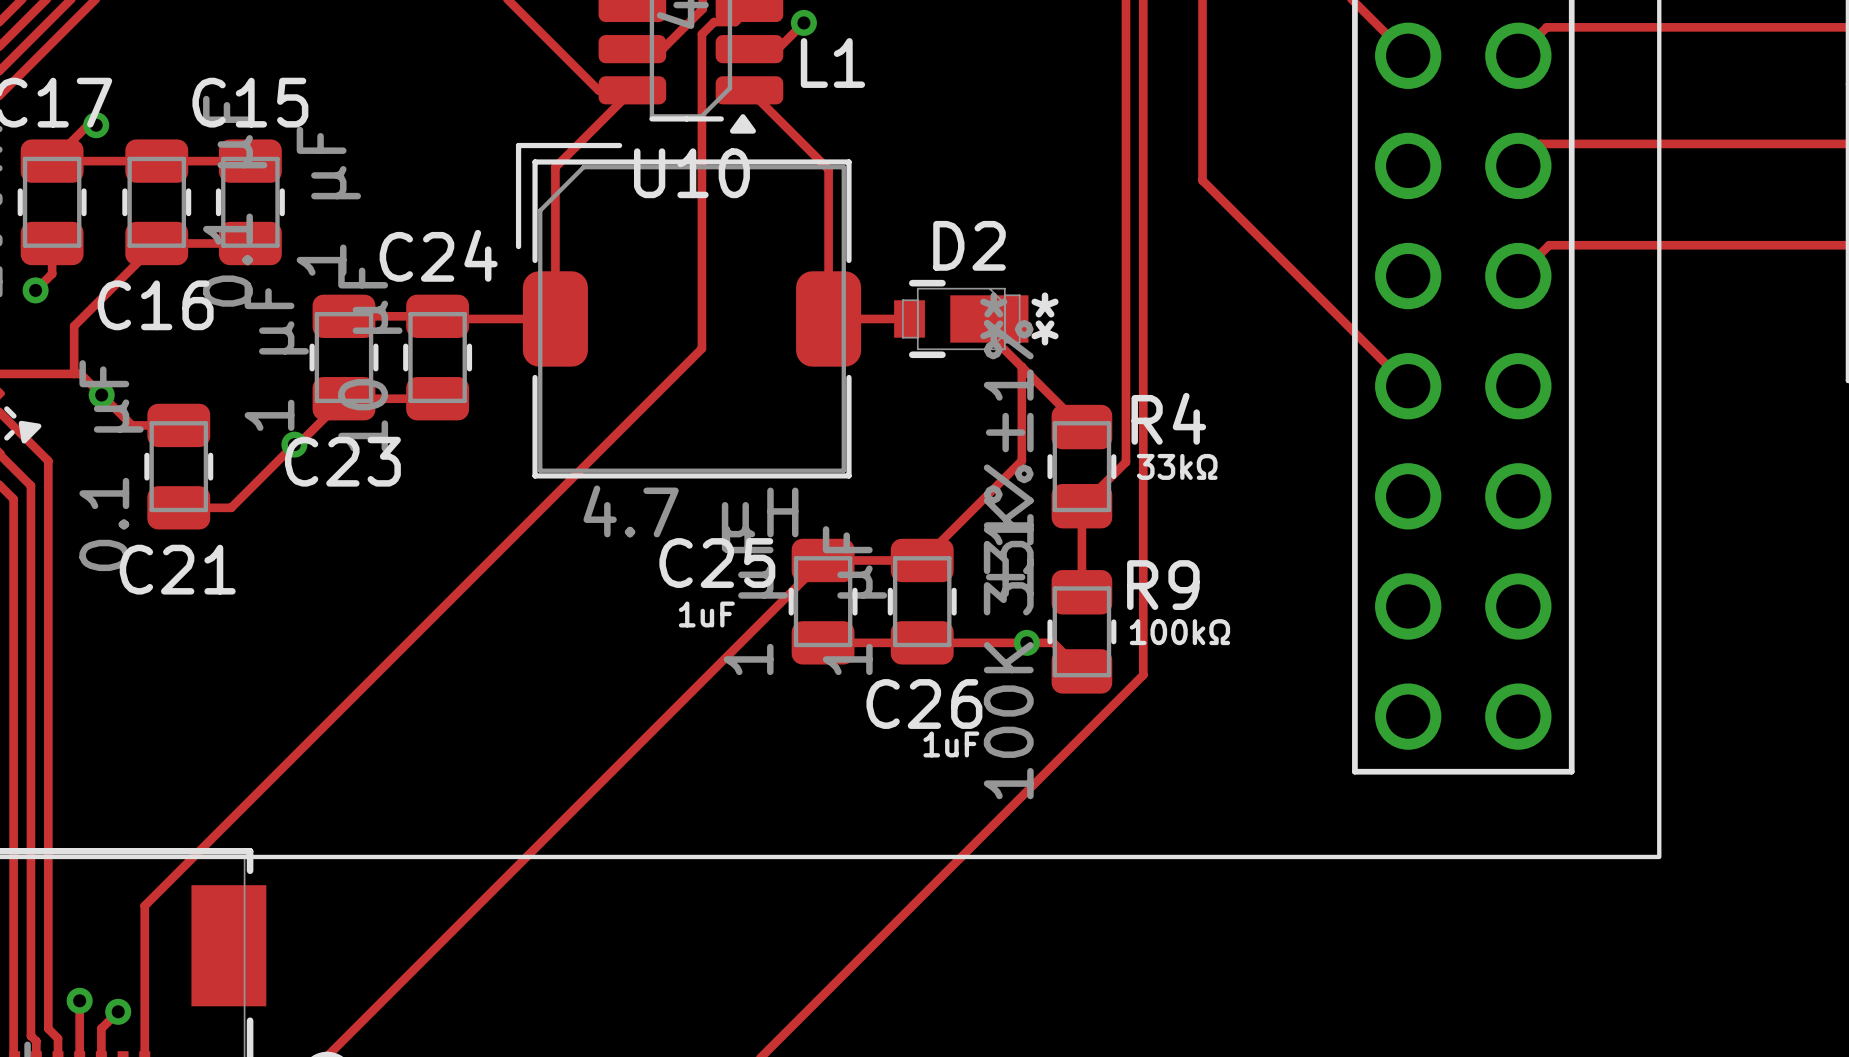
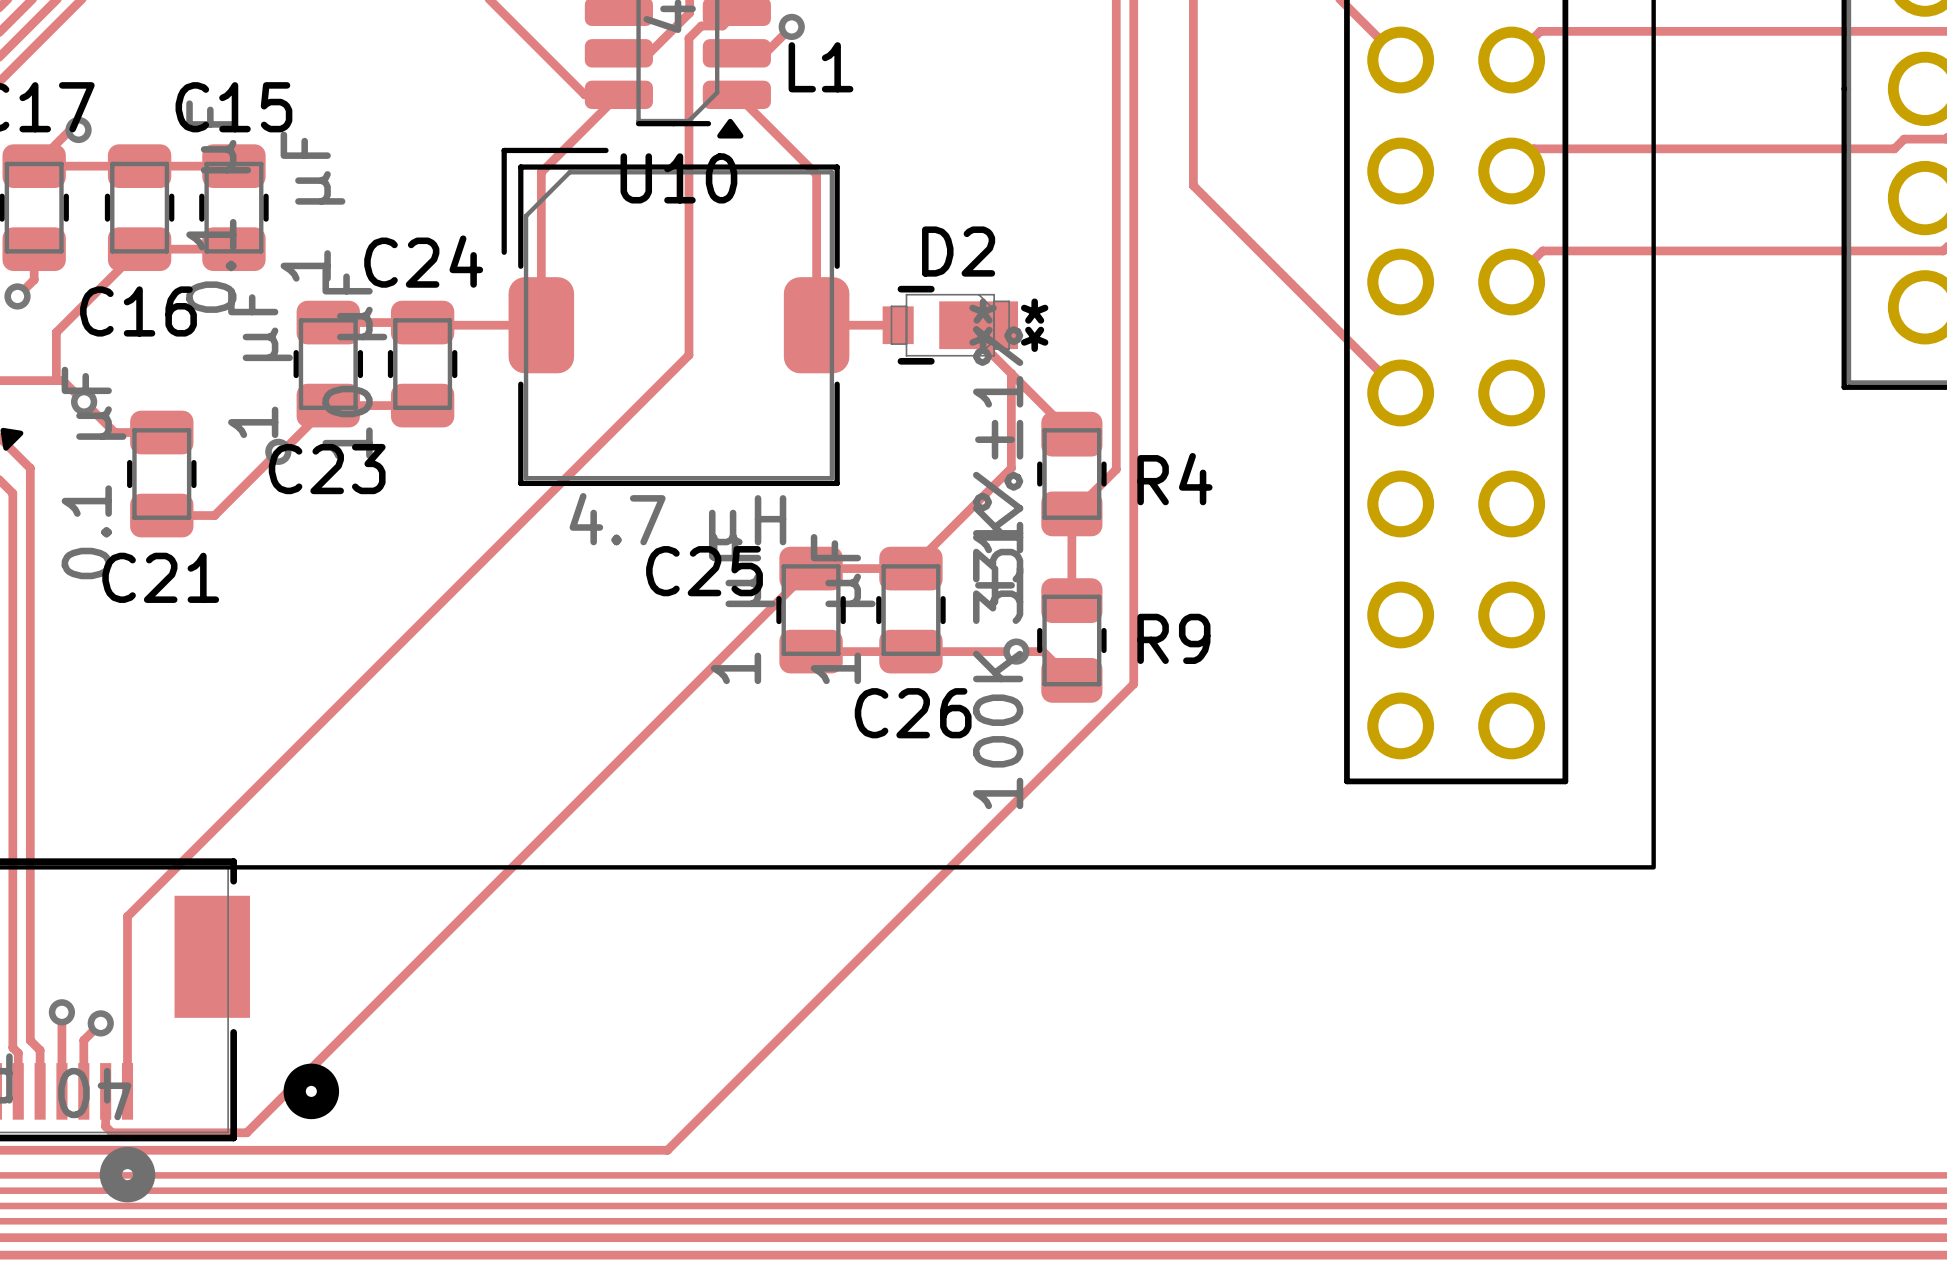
R4 name position: R4 (1168, 418) -> R4 (1174, 479)
text: 33kΩ (1177, 466) -> none
R9 name position: R9 (1163, 585) -> R9 (1173, 638)
text: 1uF (706, 614) -> none
text: 100kΩ (1179, 632) -> none
text: 1uF (951, 744) -> none

